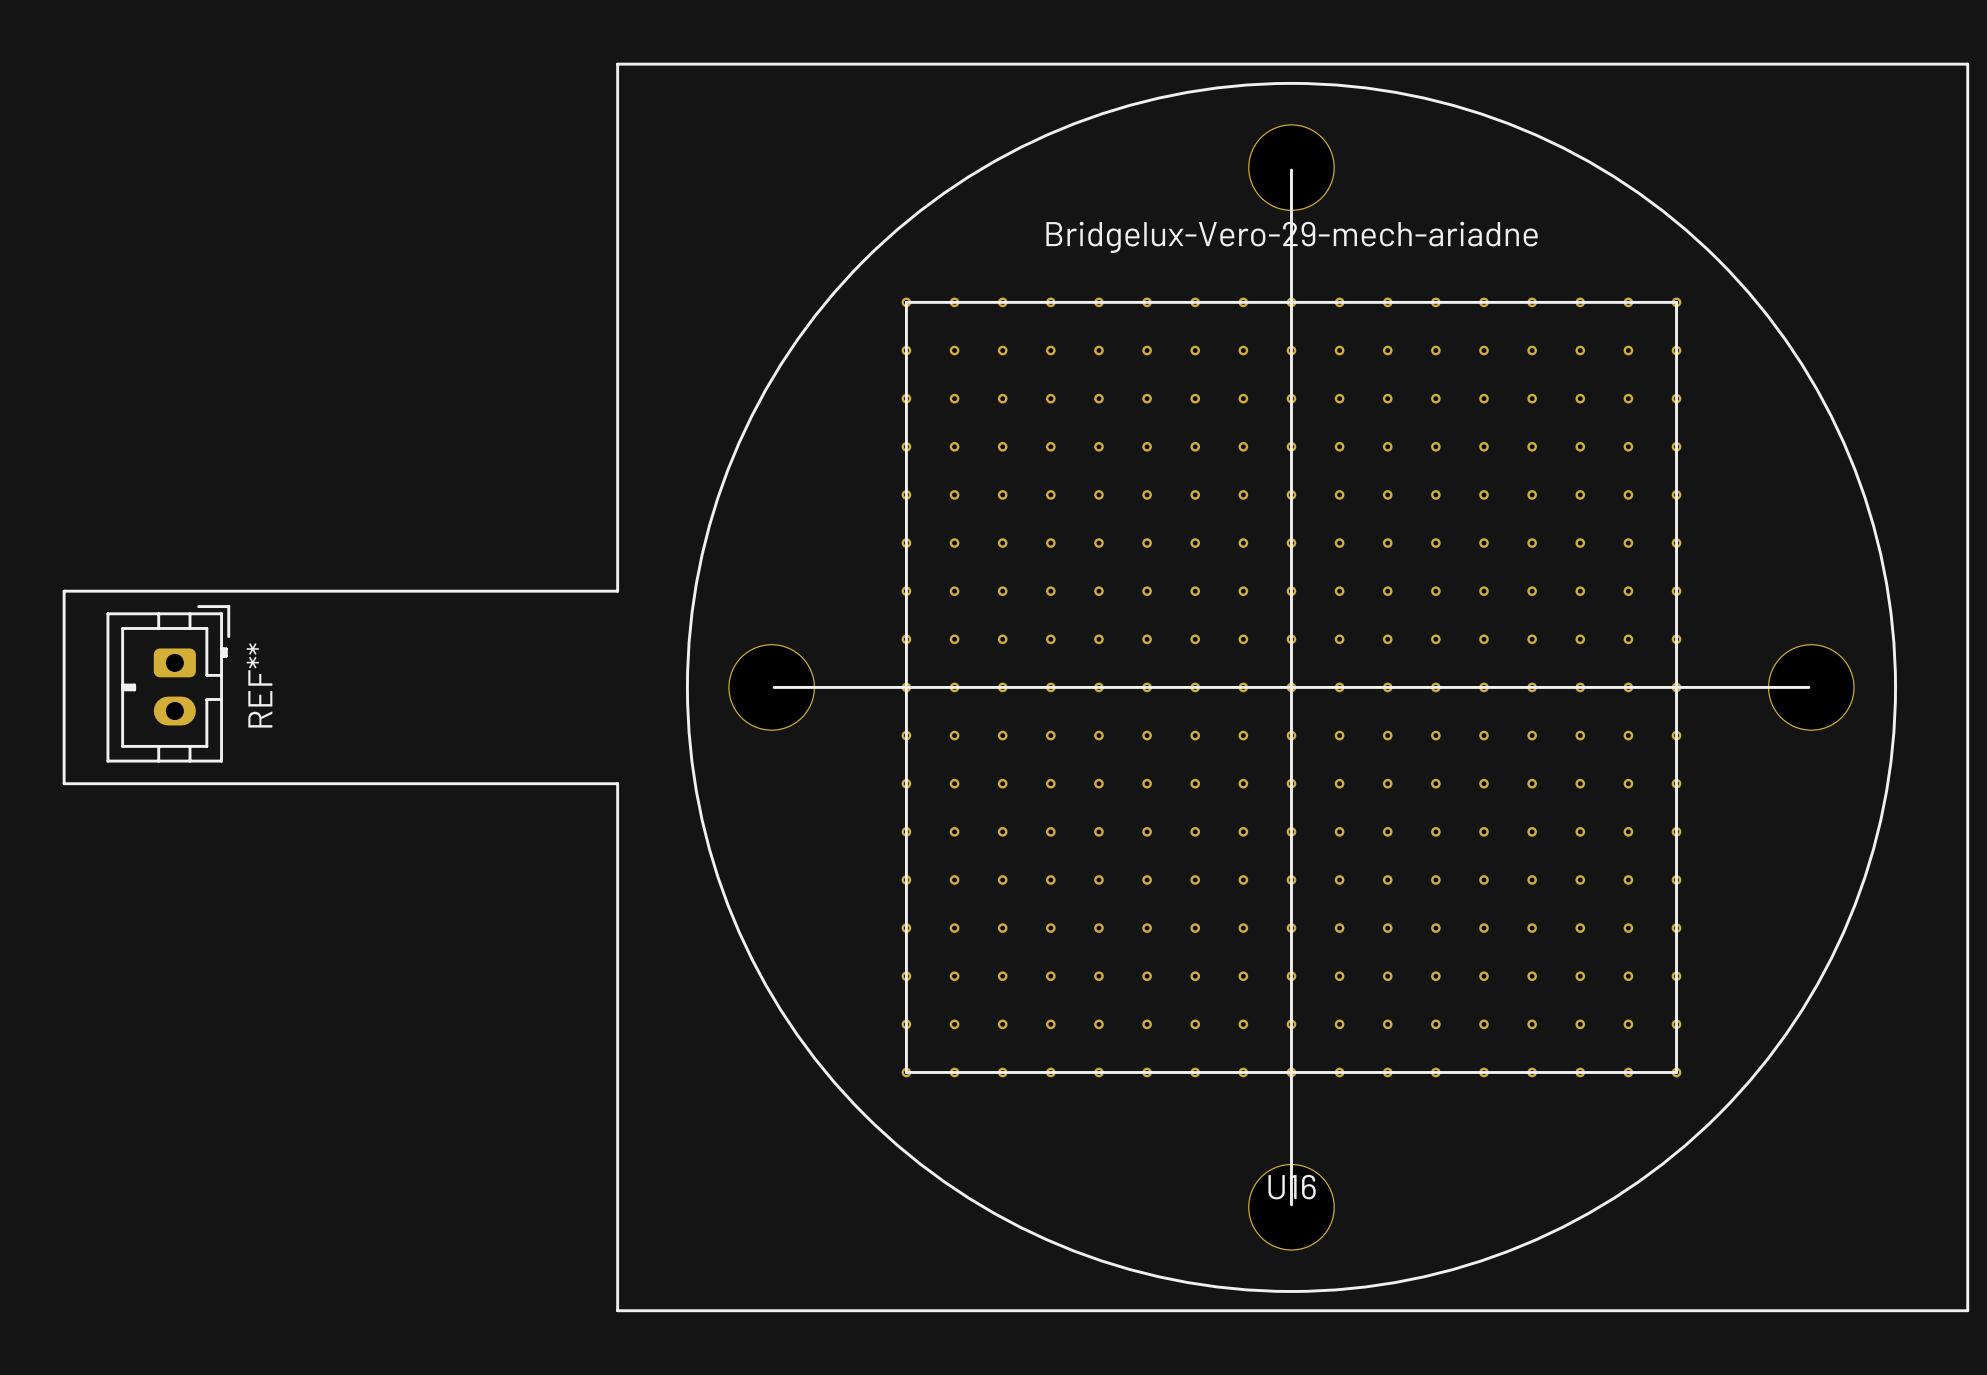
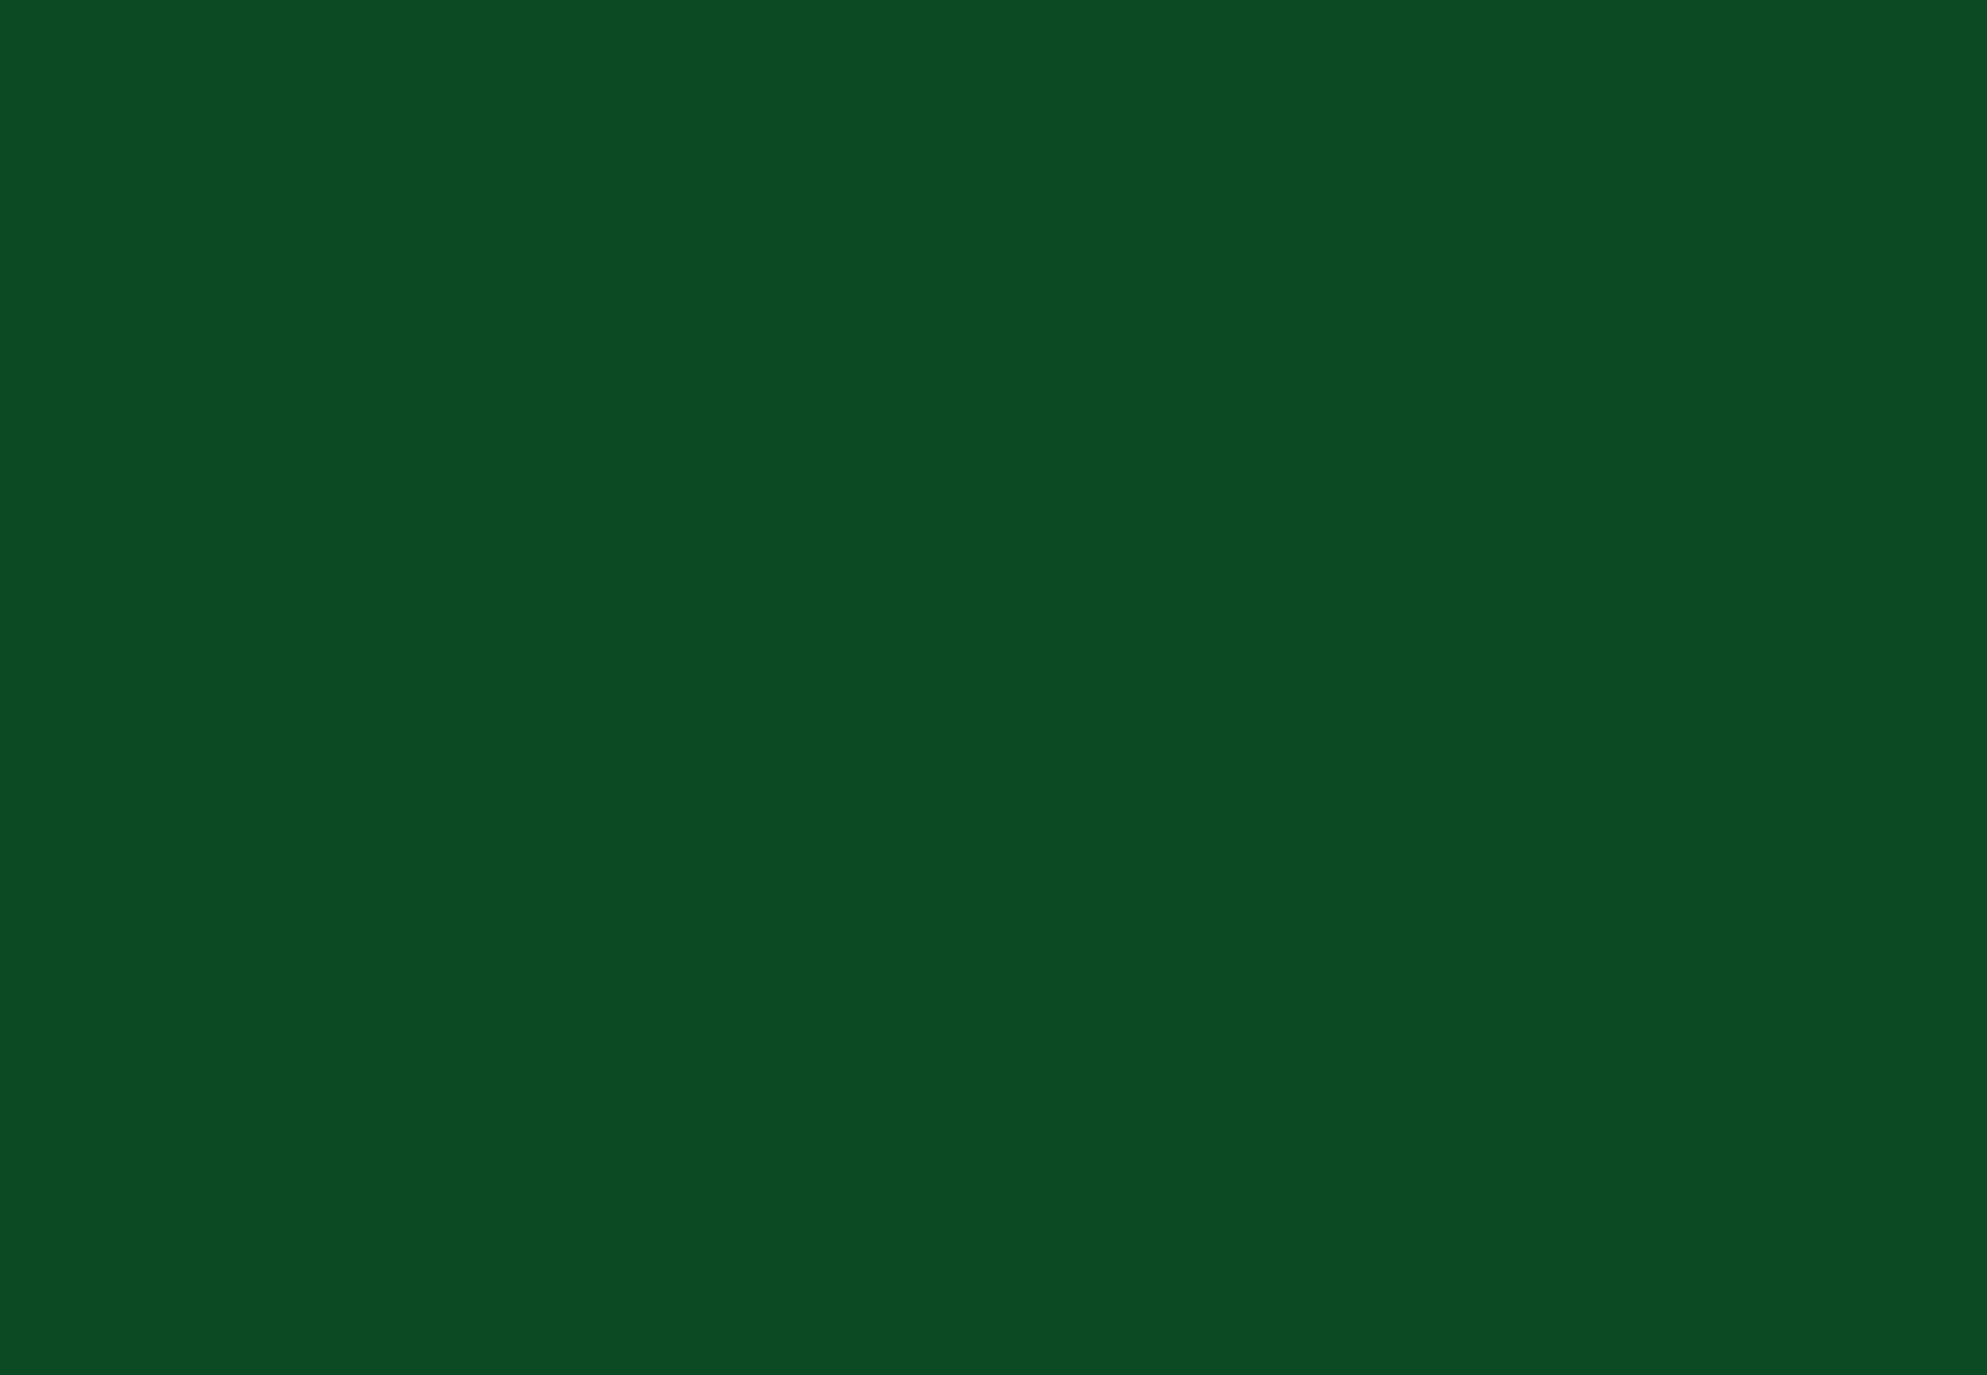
U16: Bridgelux-Vero-29-mech-ariadne (1015, 687) -> none

